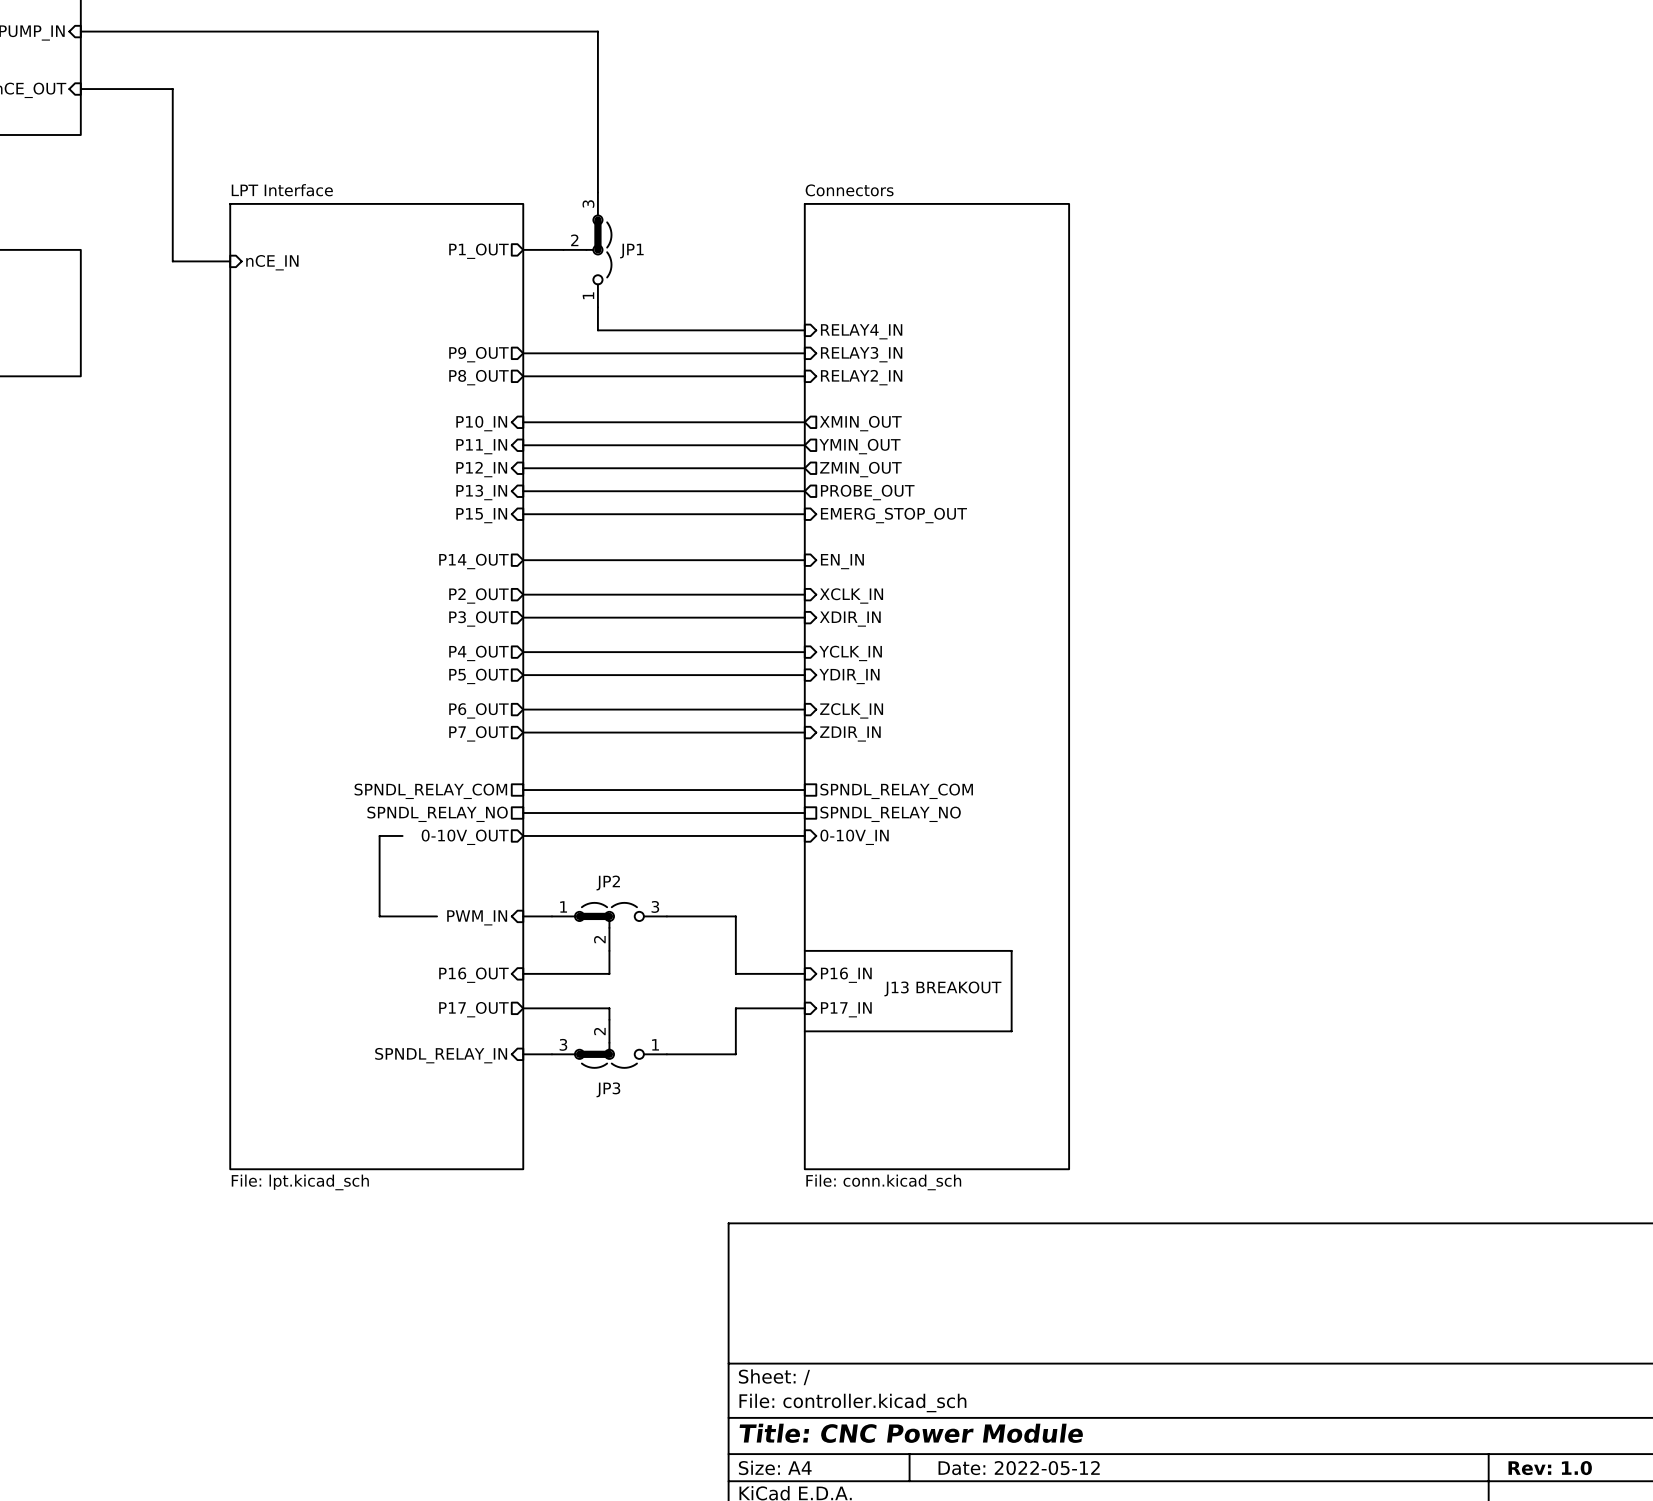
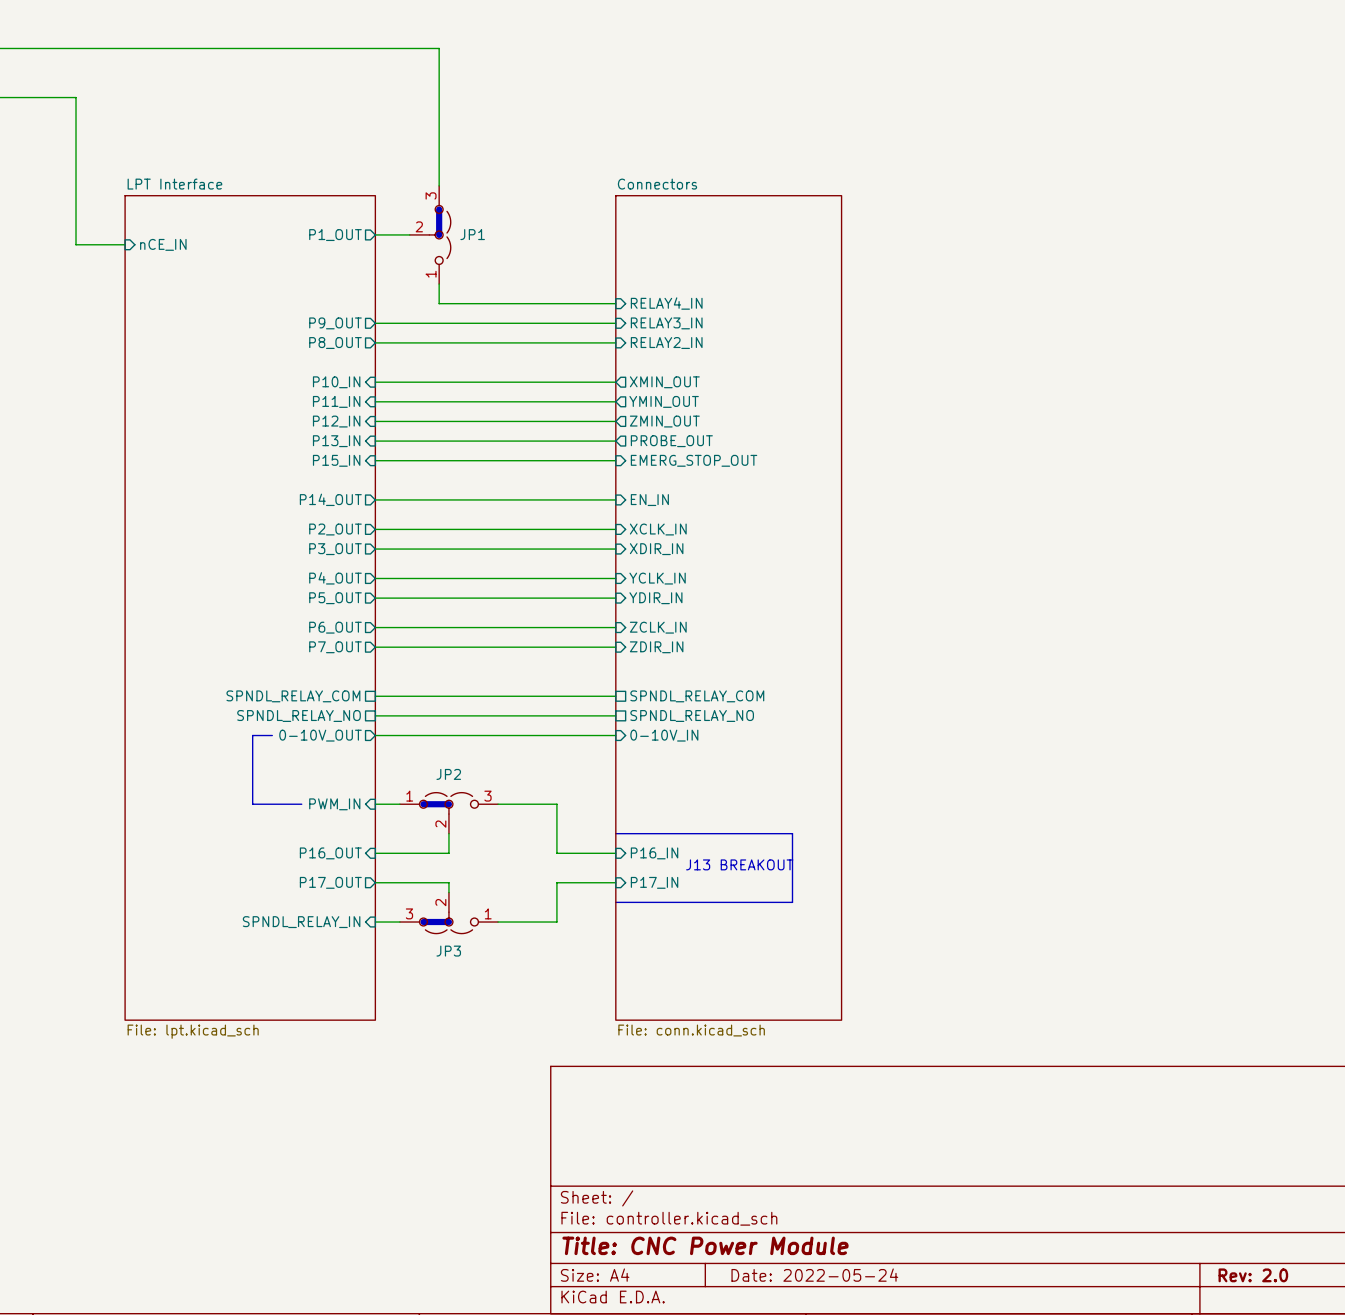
title block: Date: 2022-05-12 (1019, 1468) -> Date: 2022-05-24 (814, 1275)
title block: Rev: 1.0 (1550, 1468) -> Rev: 2.0 (1253, 1275)

